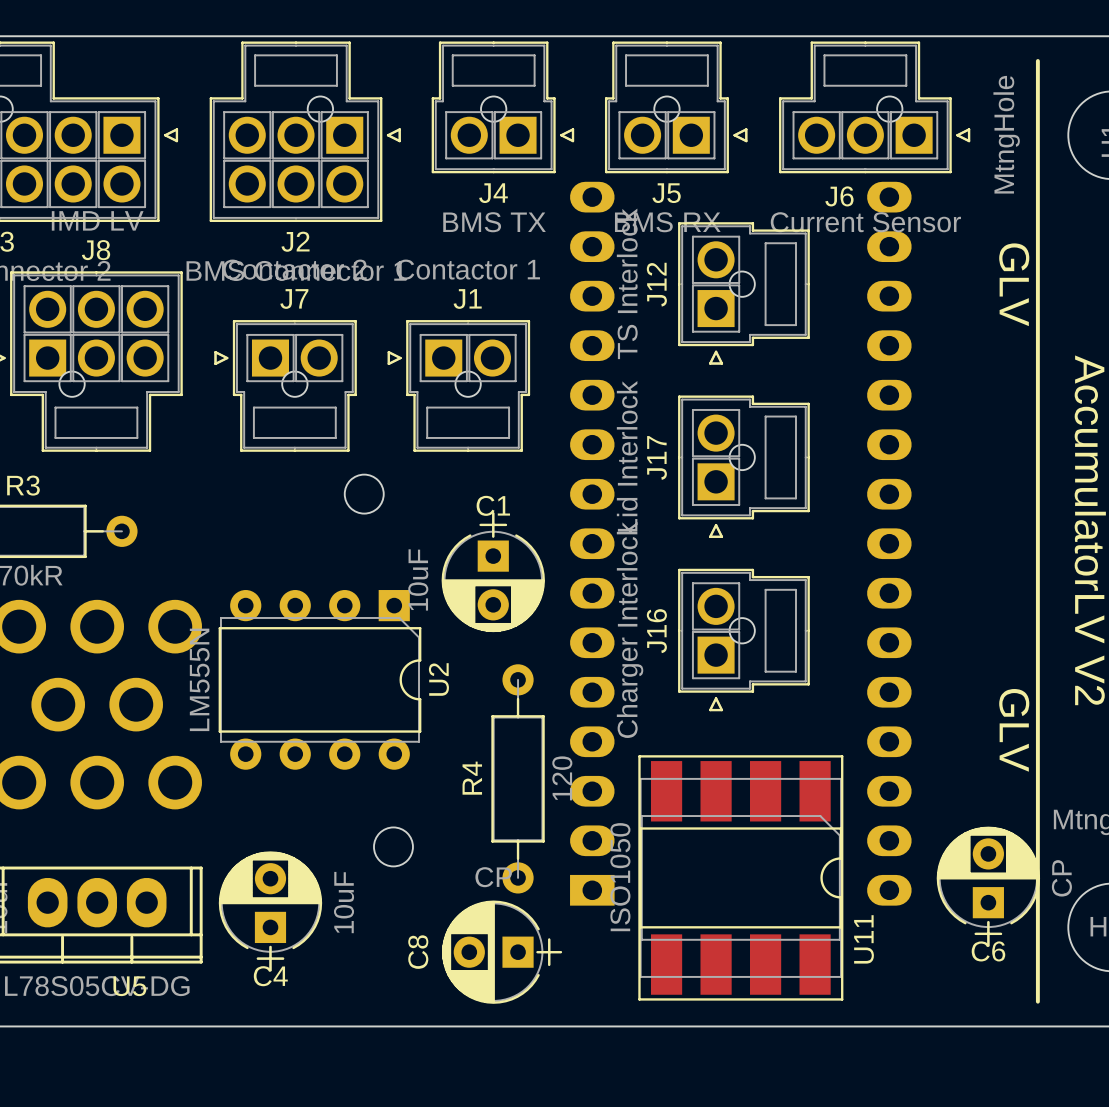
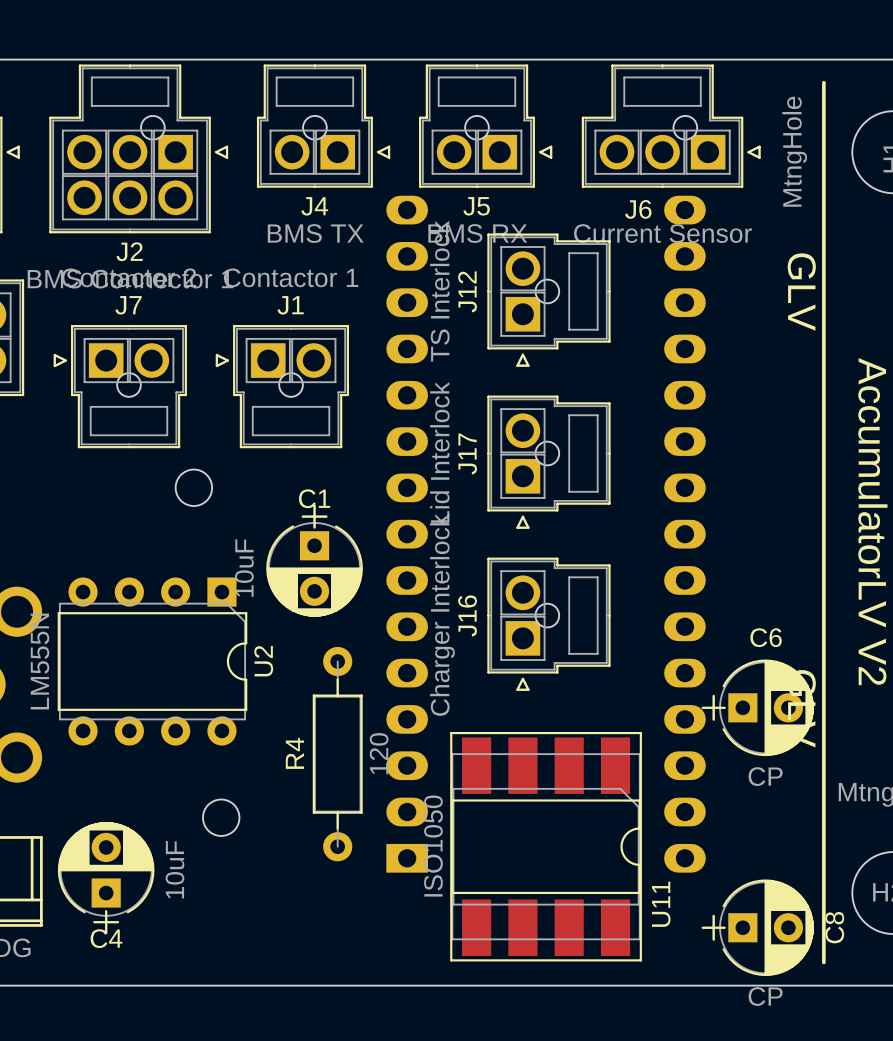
C6 rotation: 0° (988, 886) -> 90° clockwise (757, 707)
C6 position: (988, 886) -> (757, 707)
C6 name position: C6 (988, 951) -> C6 (766, 637)
C8 rotation: 0° (502, 952) -> 180° (757, 927)
C8 position: (502, 952) -> (757, 927)

